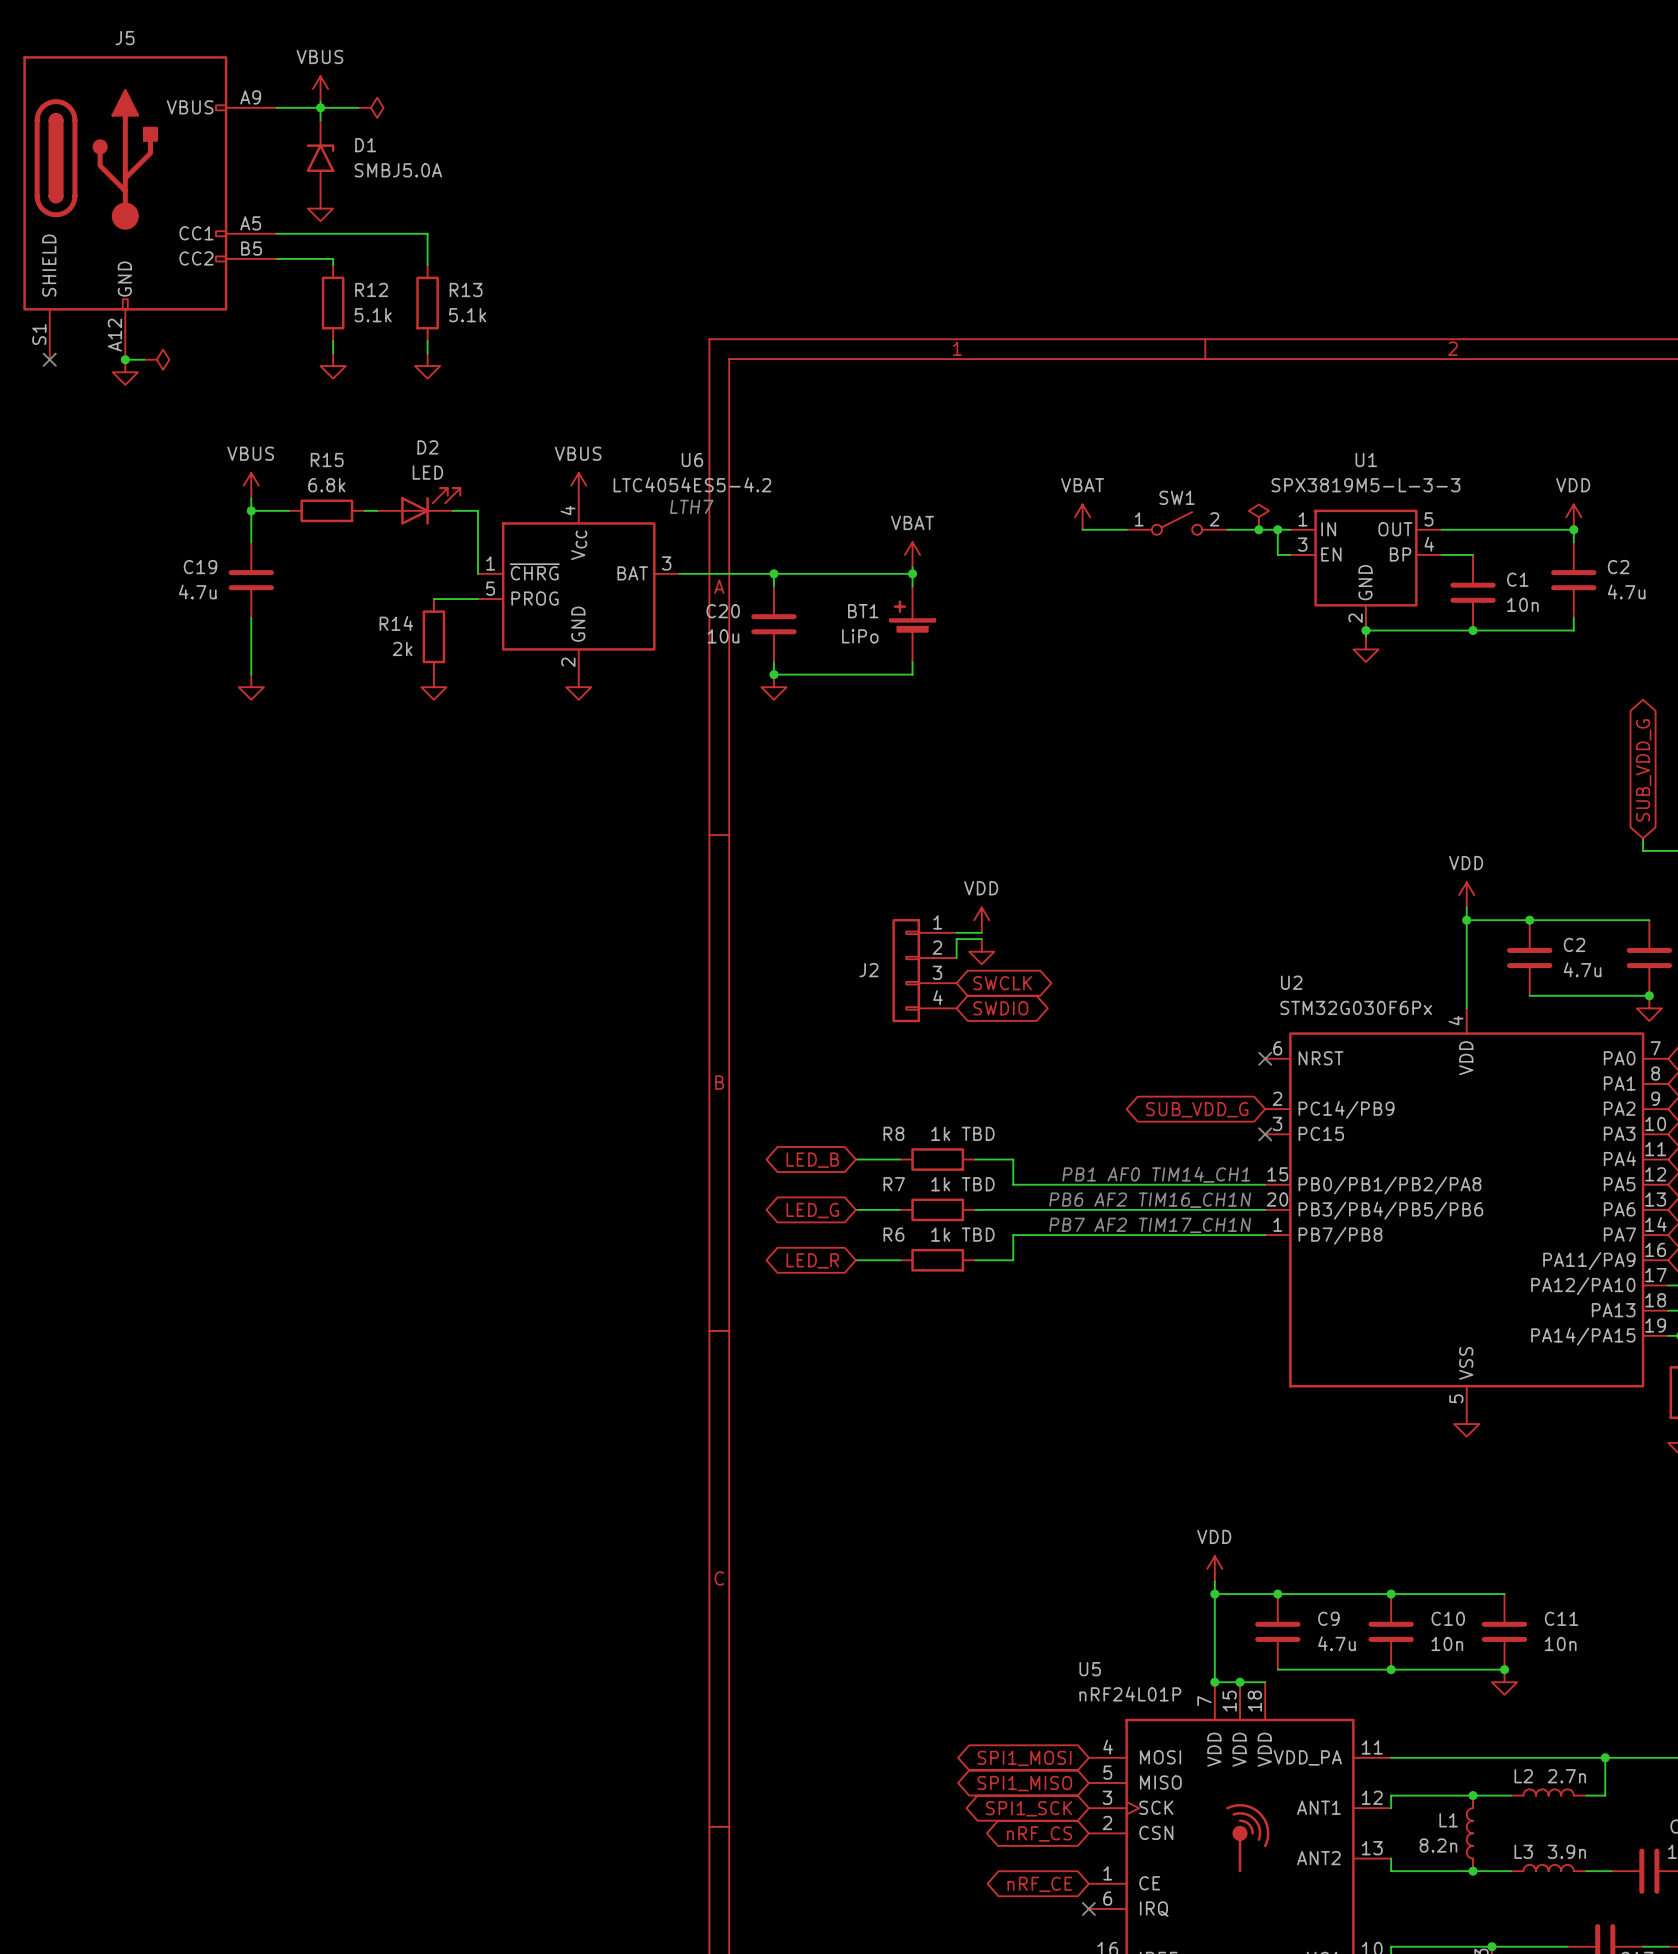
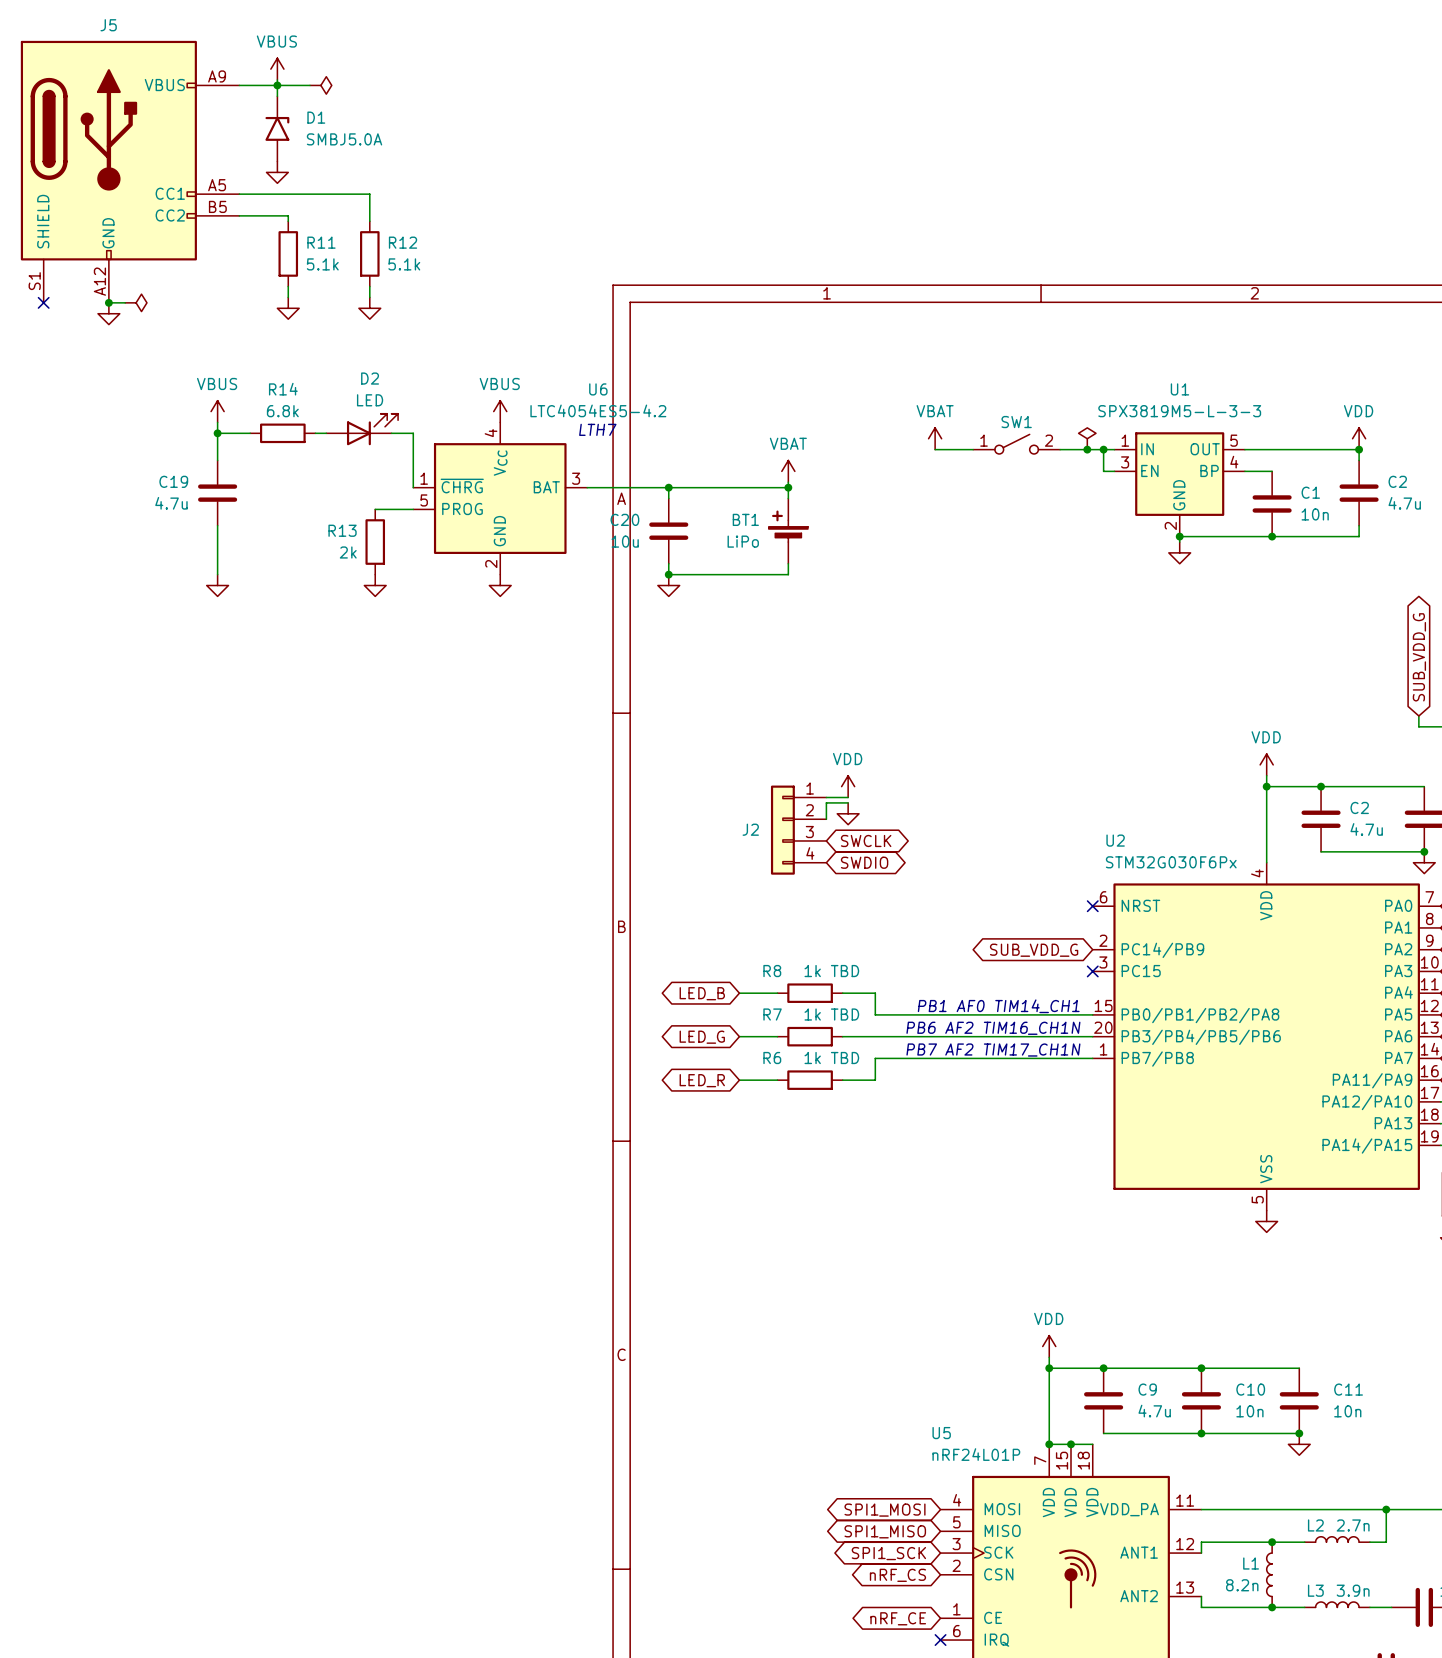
R12 name: R12 (371, 289) -> R11 (321, 242)
R13 name: R13 (466, 289) -> R12 (403, 242)
R15 name: R15 (327, 460) -> R14 (283, 389)
R14 name: R14 (396, 623) -> R13 (342, 530)

